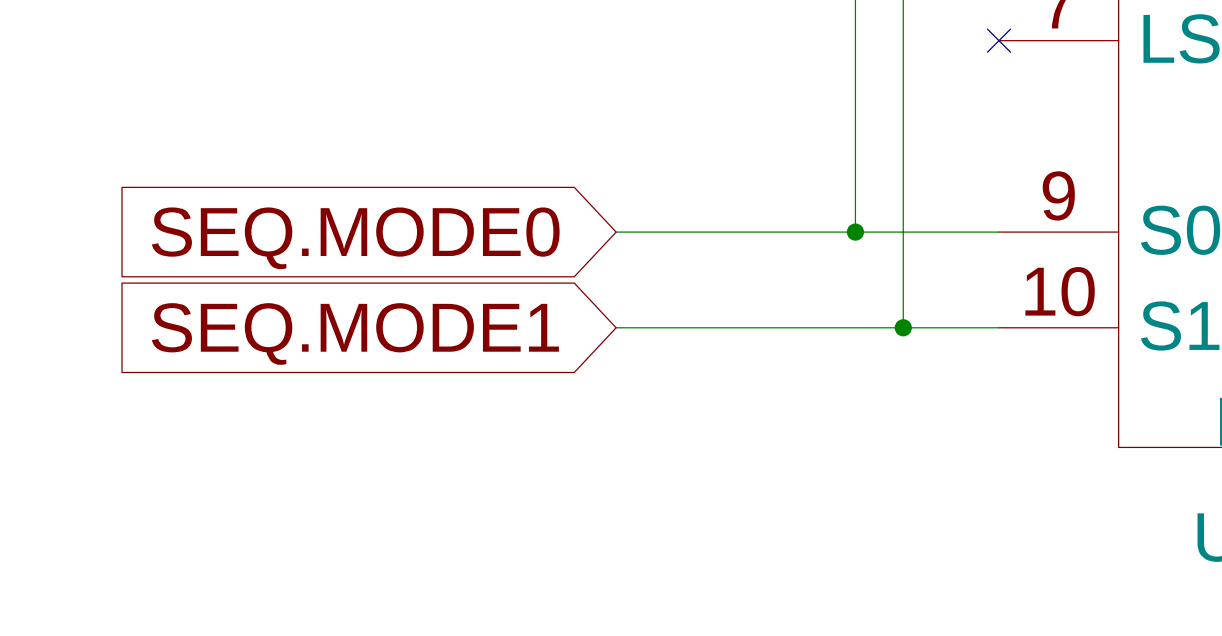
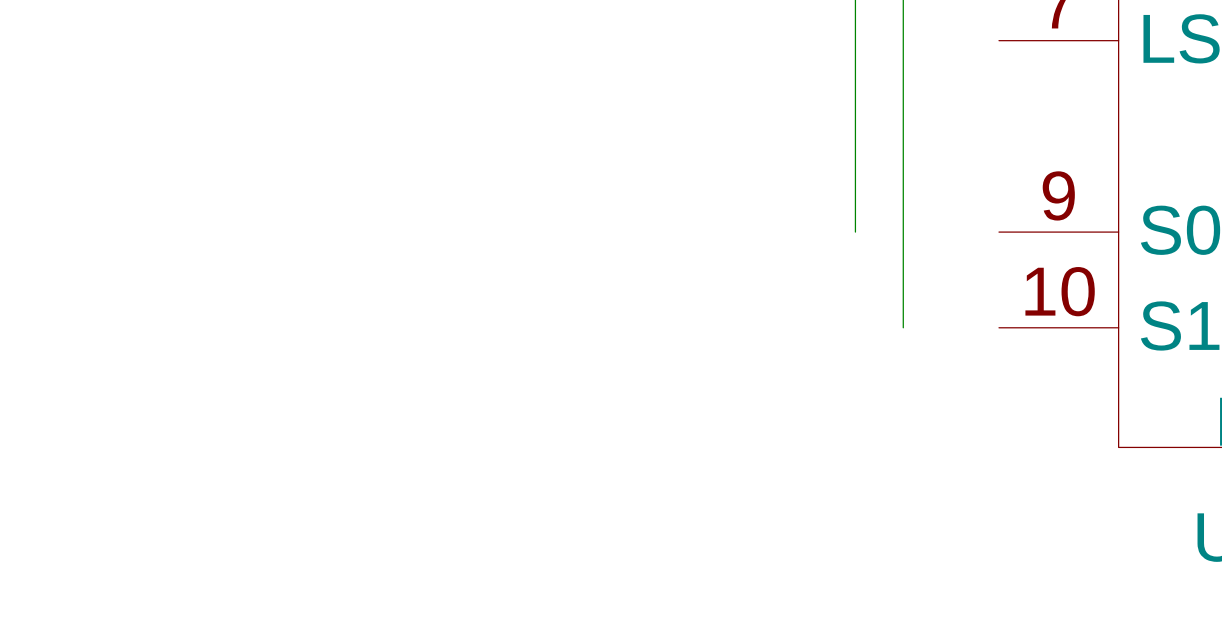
no-connect mark: (998, 40) -> none
wire: (616, 232) (998, 232) -> none
junction: (855, 232) -> none
global label: SEQ.MODE0 (355, 238) -> none
wire: (616, 327) (998, 327) -> none
junction: (903, 327) -> none
global label: SEQ.MODE1 (355, 334) -> none

